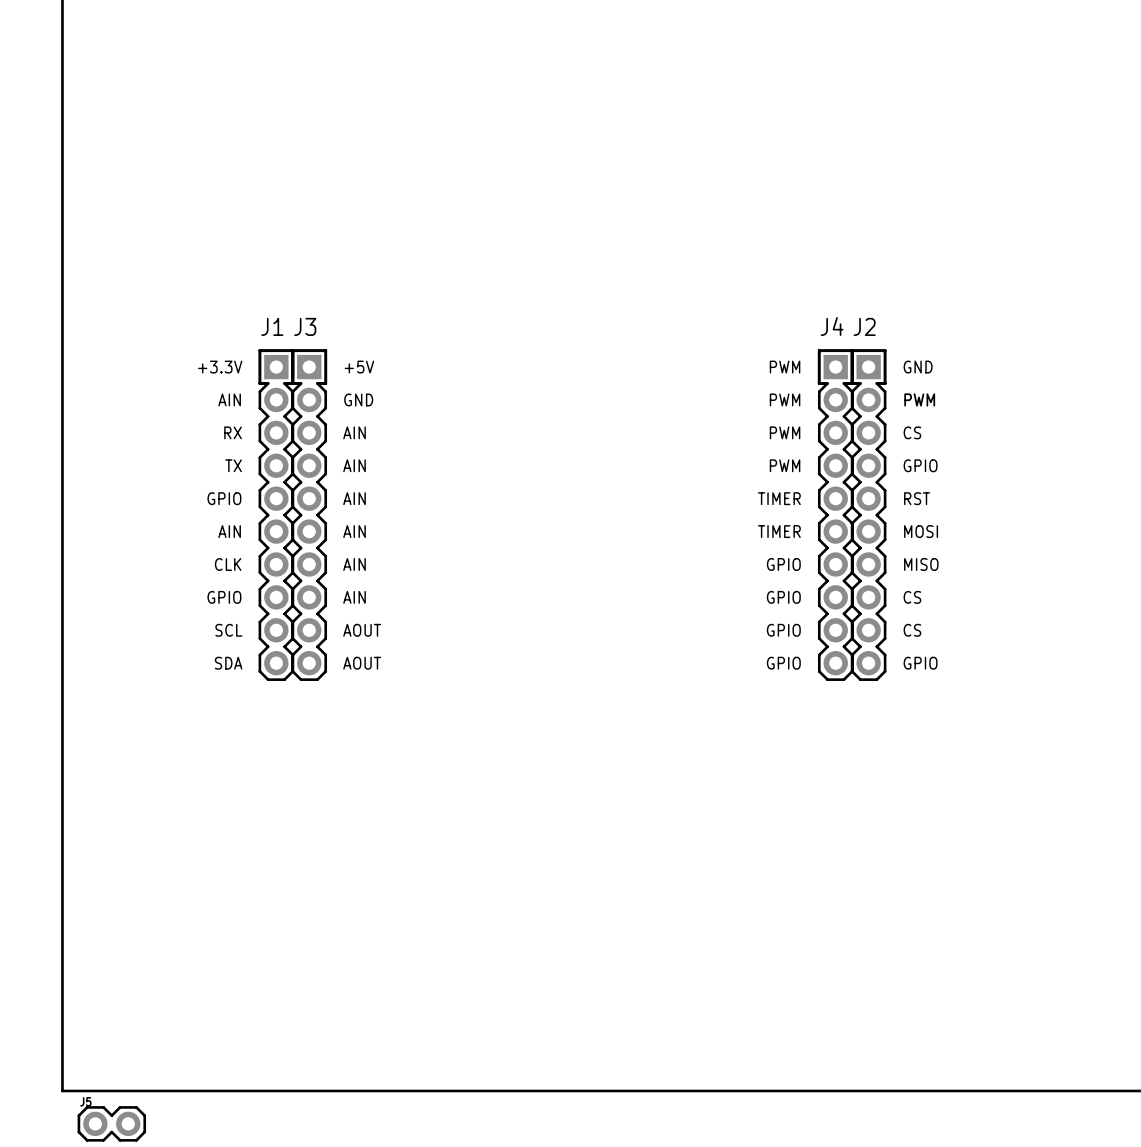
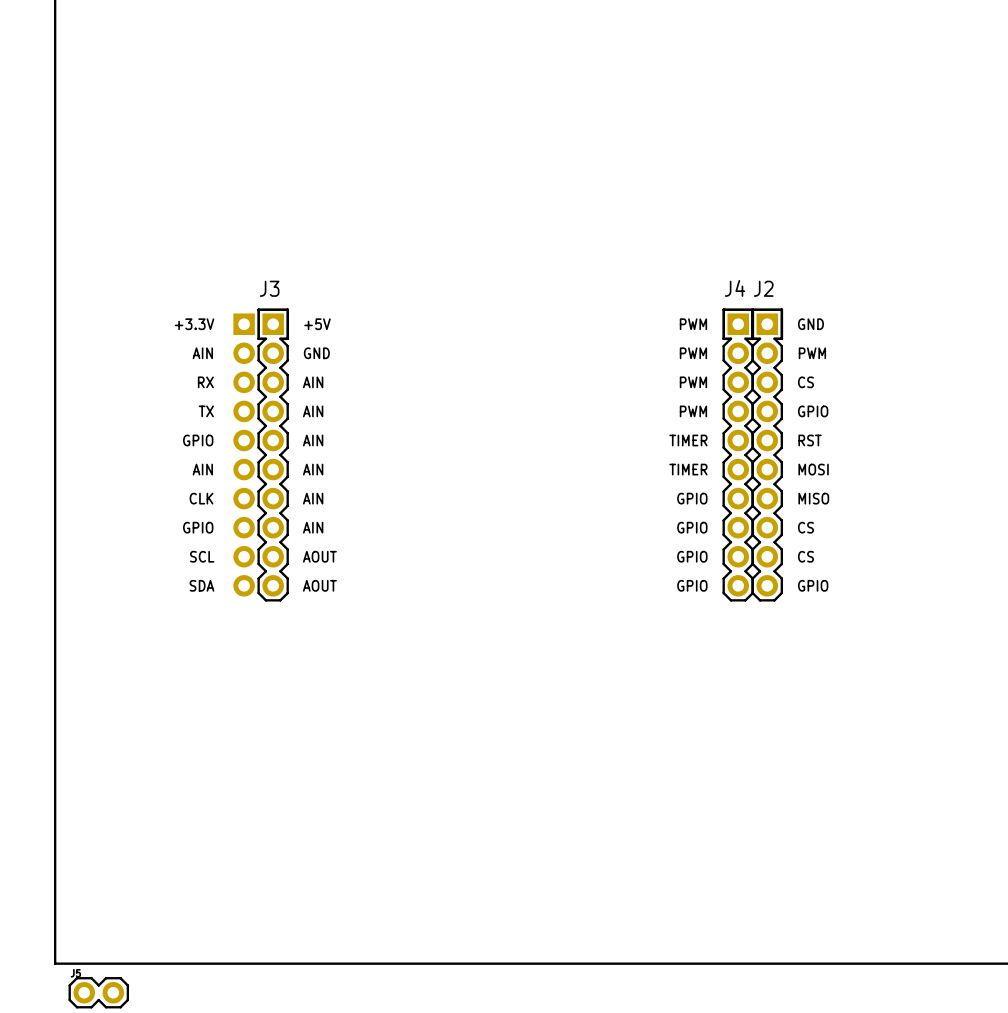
J1 side: top (276, 515) -> bottom (244, 455)

